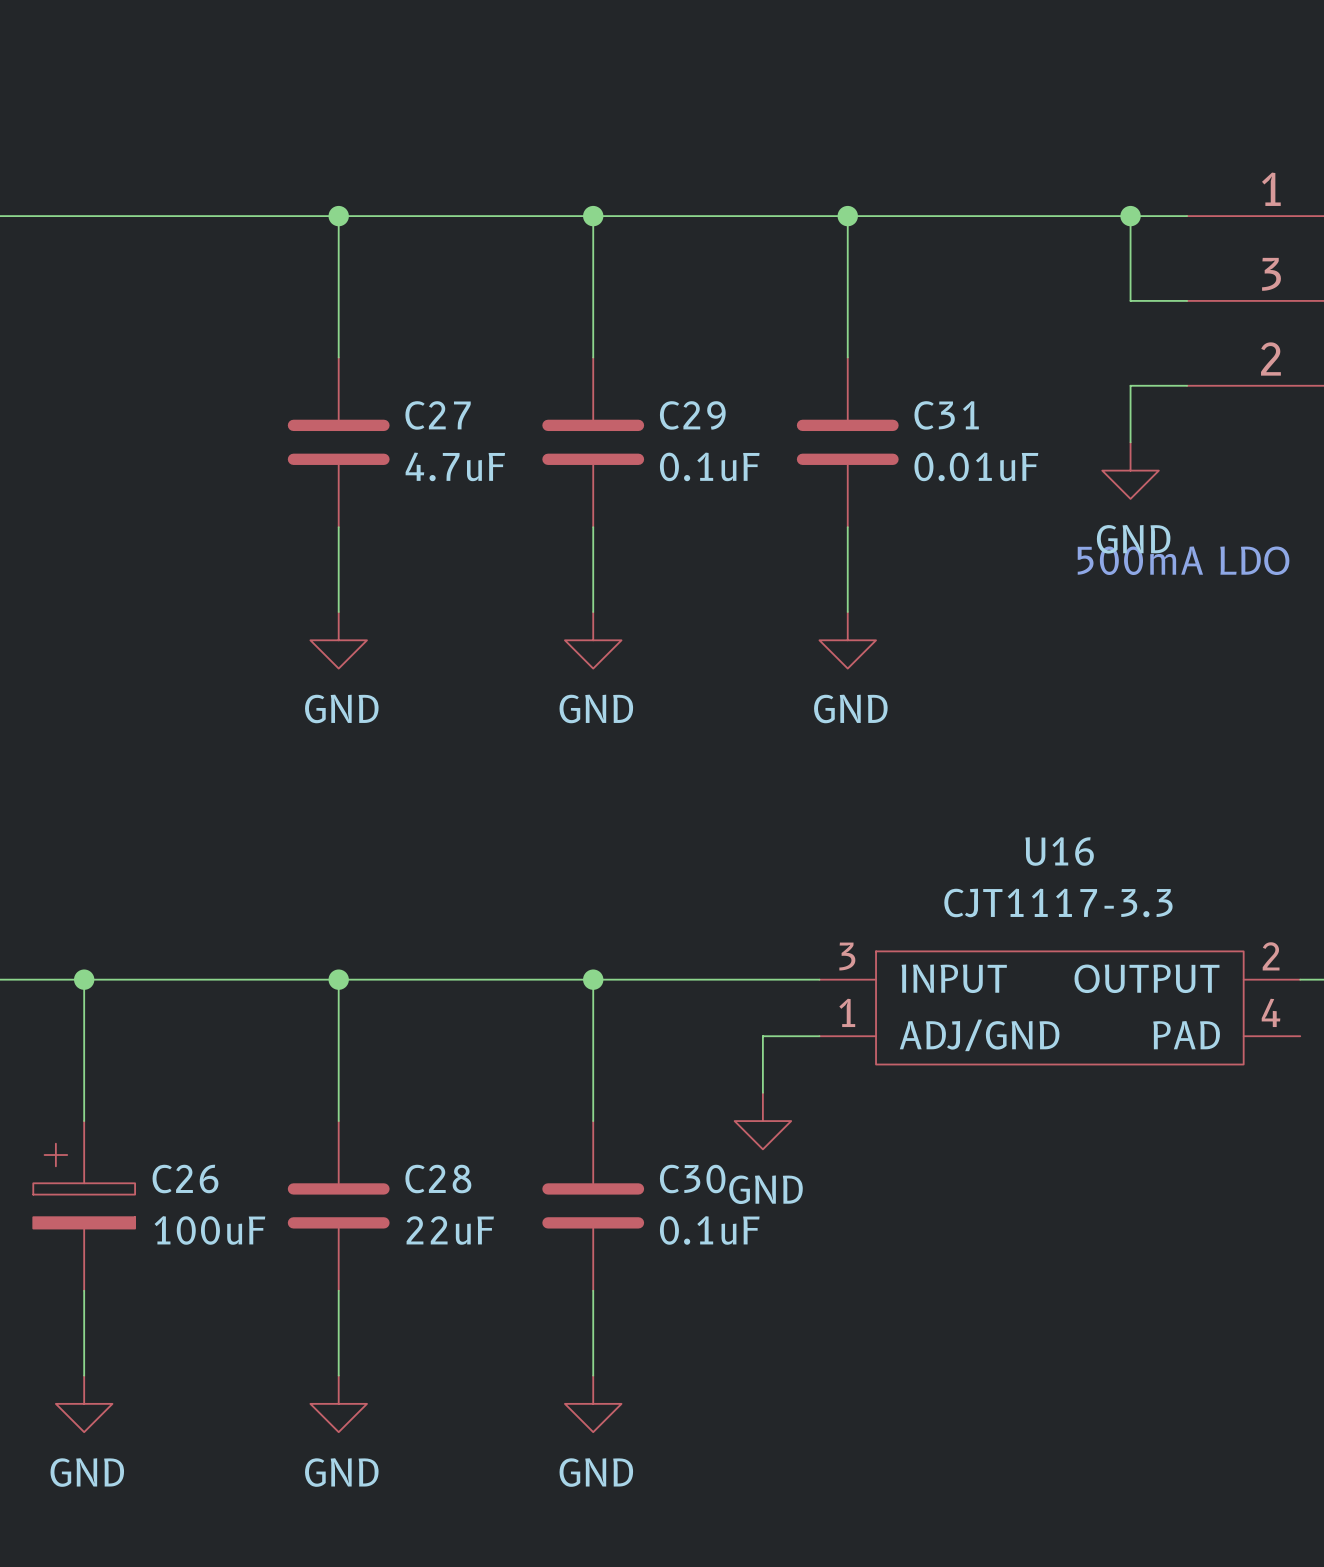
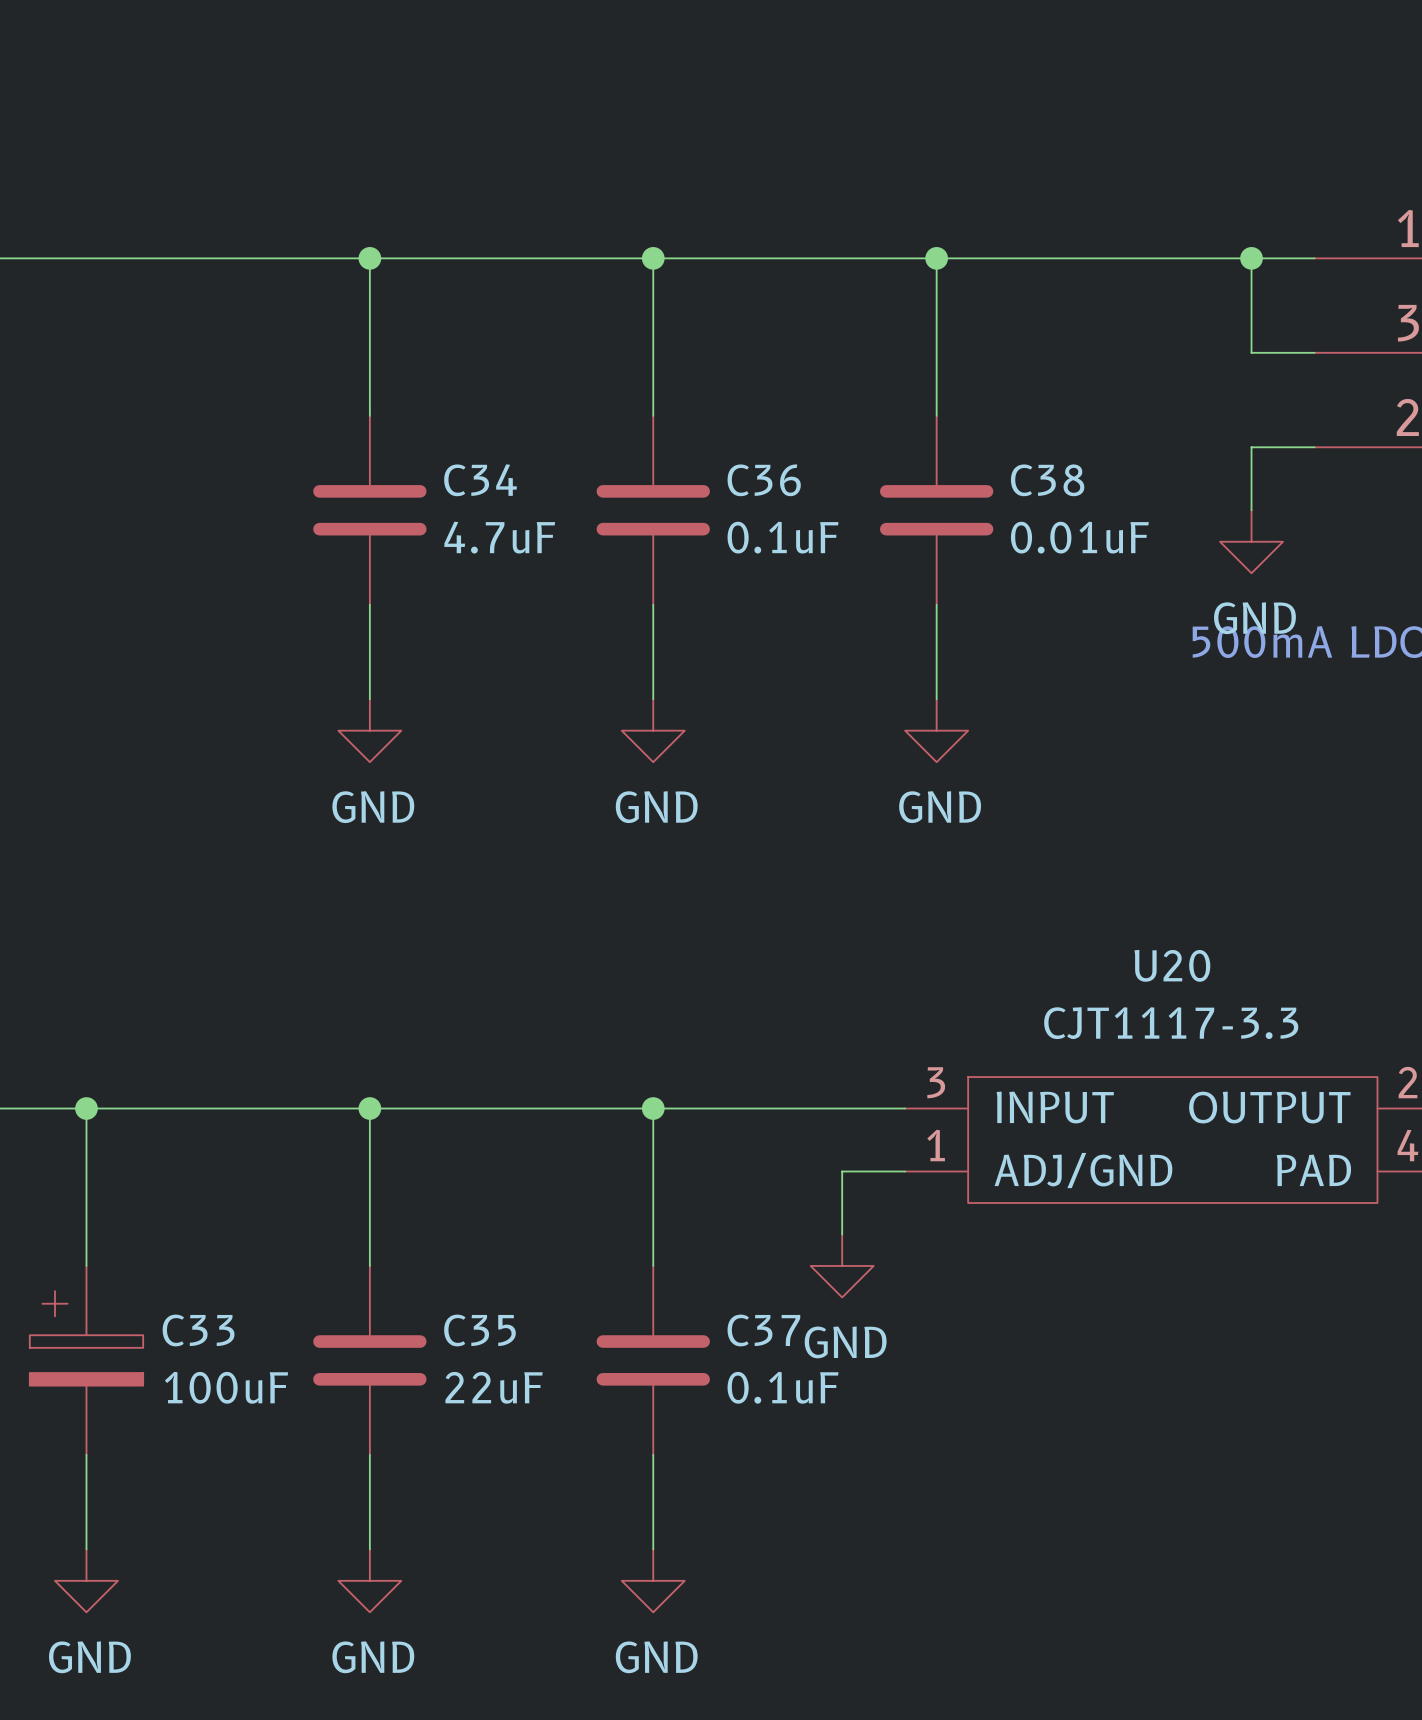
C27 name: C27 (438, 415) -> C34 (480, 480)
C29 name: C29 (692, 415) -> C36 (764, 480)
C31 name: C31 (946, 415) -> C38 (1047, 480)
U16 name: U16 (1059, 851) -> U20 (1172, 965)
C26 name: C26 (185, 1179) -> C33 (198, 1330)
C28 name: C28 (438, 1179) -> C35 (479, 1330)
C30 name: C30 (692, 1179) -> C37 (763, 1330)

